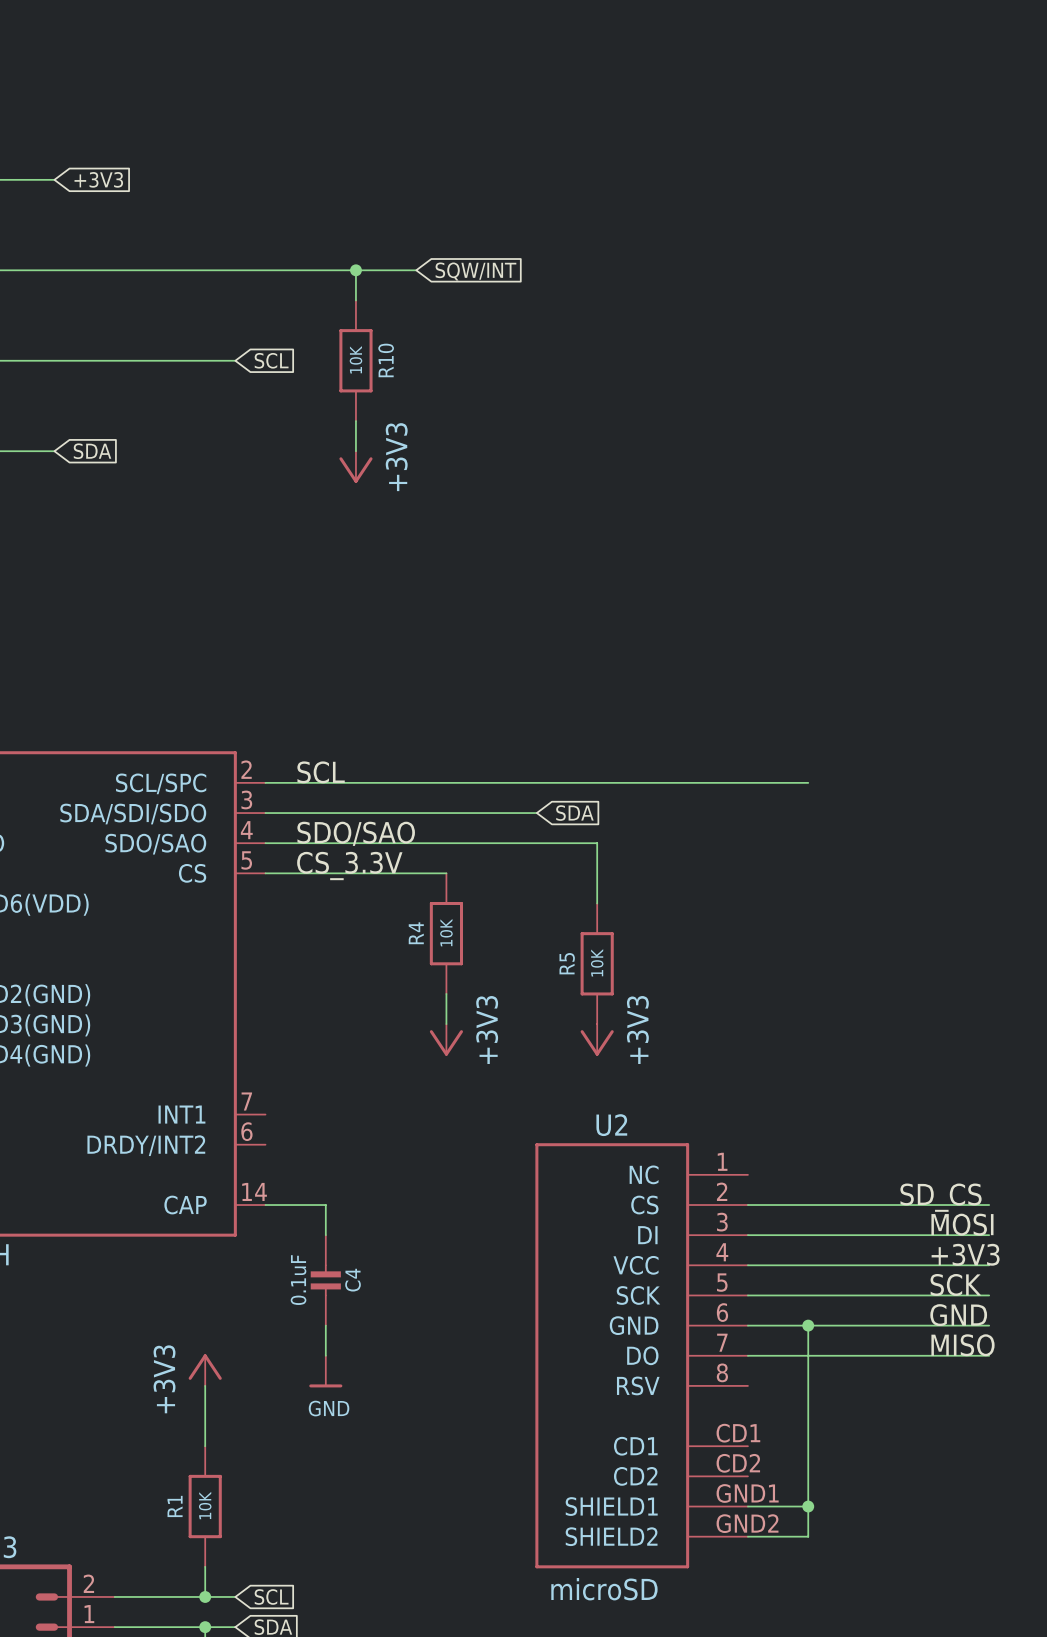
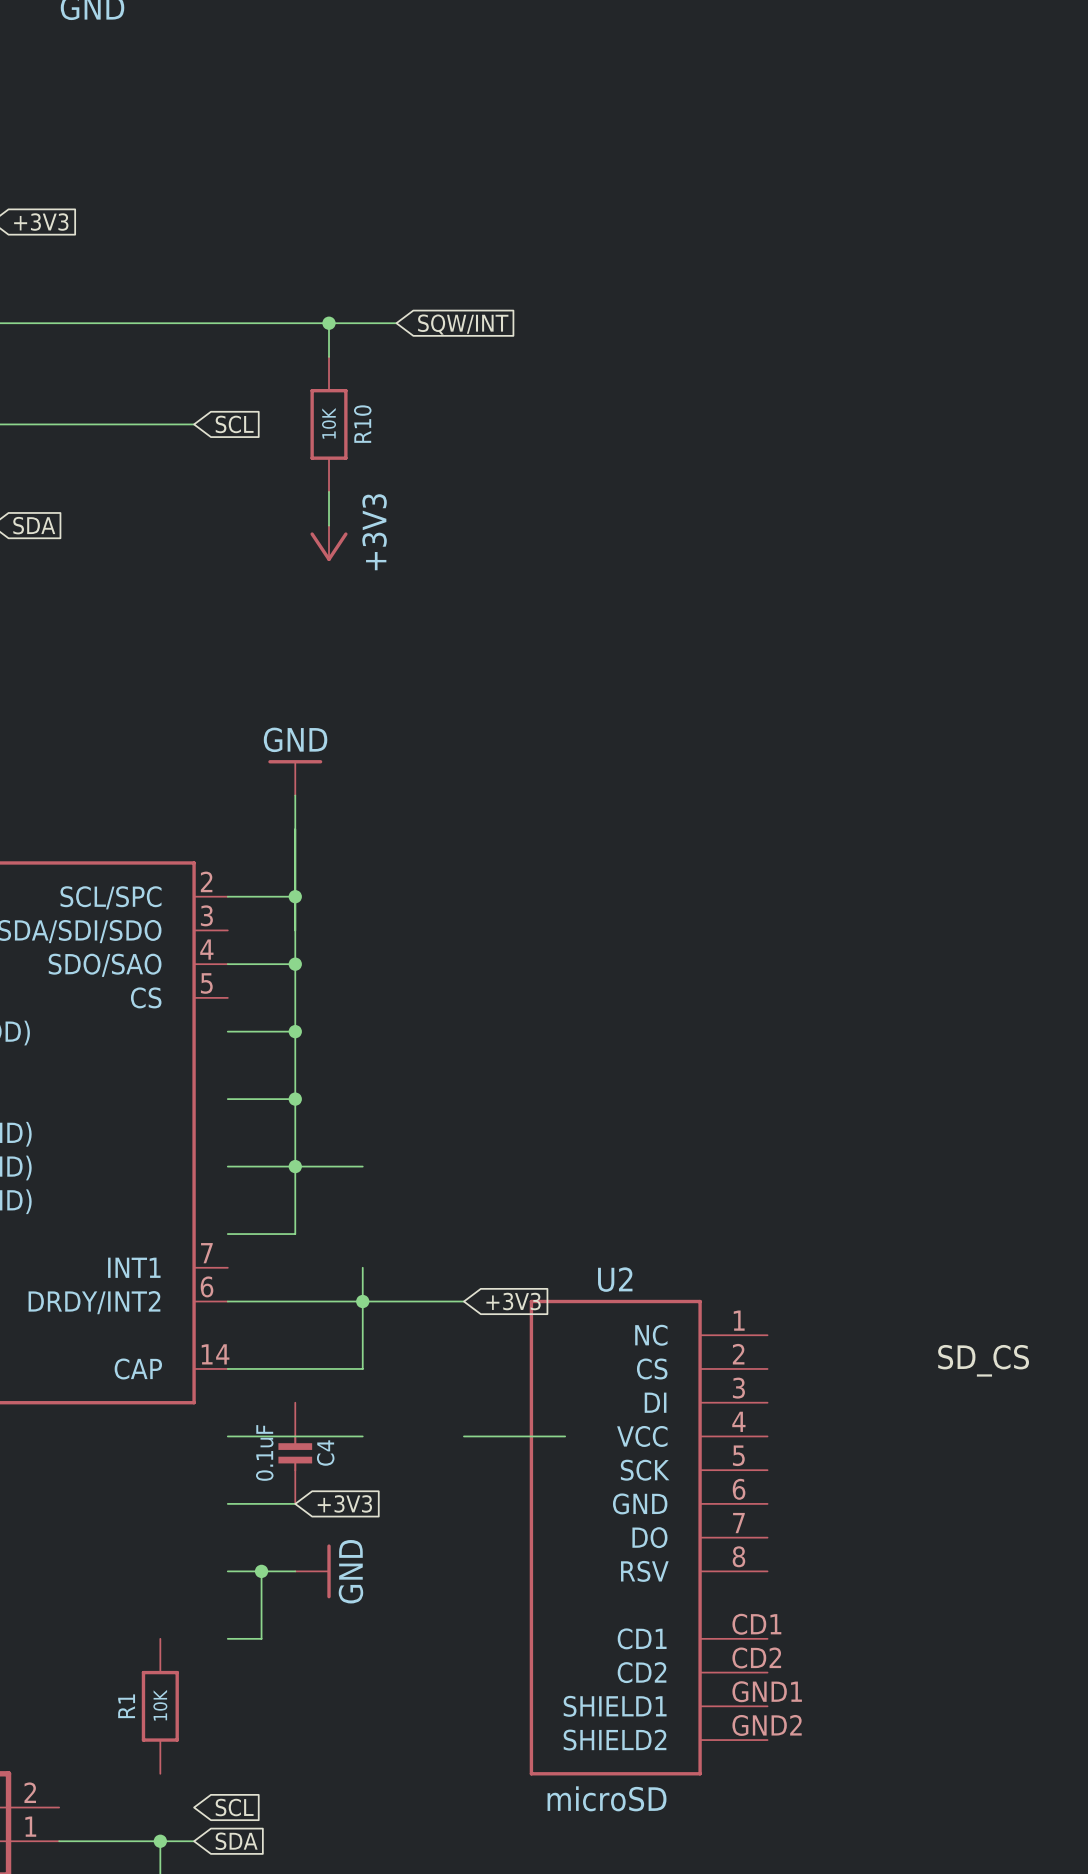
power symbol: none -> GND (295, 777)
wire: none -> (295, 795) (295, 1234) (227, 1234)
label: SCL (321, 772) -> none
wire: (325, 782) (808, 782) -> none
junction: none -> (295, 896)
wire: (265, 813) (536, 813) -> none
global label: SDA (574, 813) -> none
label: SDO/SAO (356, 833) -> none
wire: (325, 843) (597, 843) (597, 903) -> none
junction: none -> (295, 964)
label: CS_3.3V (349, 866) -> none
wire: (265, 873) (446, 873) -> none
wire: none -> (227, 1031) (295, 1031)
junction: none -> (295, 1031)
R4: 10K (446, 933) -> none
wire: none -> (227, 1099) (295, 1099)
junction: none -> (295, 1099)
R5: 10K (597, 963) -> none
wire: (446, 993) (446, 1024) -> none
wire: none -> (227, 1166) (362, 1166)
junction: none -> (295, 1166)
power symbol: +3V3 (446, 1039) -> none
power symbol: +3V3 (597, 1039) -> none
wire: none -> (227, 1301) (463, 1301)
junction: none -> (362, 1301)
global label: none -> +3V3 (513, 1301)
wire: (325, 1205) (325, 1235) -> (295, 1368) (362, 1368) (362, 1267)
wire: (747, 1205) (989, 1205) -> none
label: MOSI (962, 1224) -> none
wire: (747, 1235) (989, 1235) -> none
label: +3V3 (965, 1254) -> none
wire: none -> (227, 1436) (362, 1436)
wire: none -> (463, 1436) (565, 1436)
wire: (747, 1265) (989, 1265) -> none
label: SCK (955, 1284) -> none
wire: (747, 1295) (989, 1295) -> none
label: GND (958, 1315) -> none
wire: (325, 1325) (325, 1355) -> (295, 1503) (227, 1503)
global label: none -> +3V3 (344, 1503)
wire: (747, 1325) (989, 1325) -> none
wire: (808, 1325) (808, 1536) (747, 1536) -> none
junction: (808, 1325) -> none
label: MISO (963, 1345) -> none
wire: (747, 1355) (989, 1355) -> none
power symbol: +3V3 (205, 1370) -> none
power symbol: GND (325, 1371) -> none
wire: (205, 1385) (205, 1446) -> none
wire: none -> (227, 1571) (295, 1571)
wire: none -> (261, 1571) (261, 1638) (227, 1638)
junction: none -> (261, 1571)
power symbol: none -> GND (312, 1571)
wire: (747, 1506) (808, 1506) -> none
junction: (808, 1506) -> none
wire: (205, 1566) (205, 1596) -> none
wire: (114, 1596) (235, 1596) -> none
junction: (205, 1596) -> none

